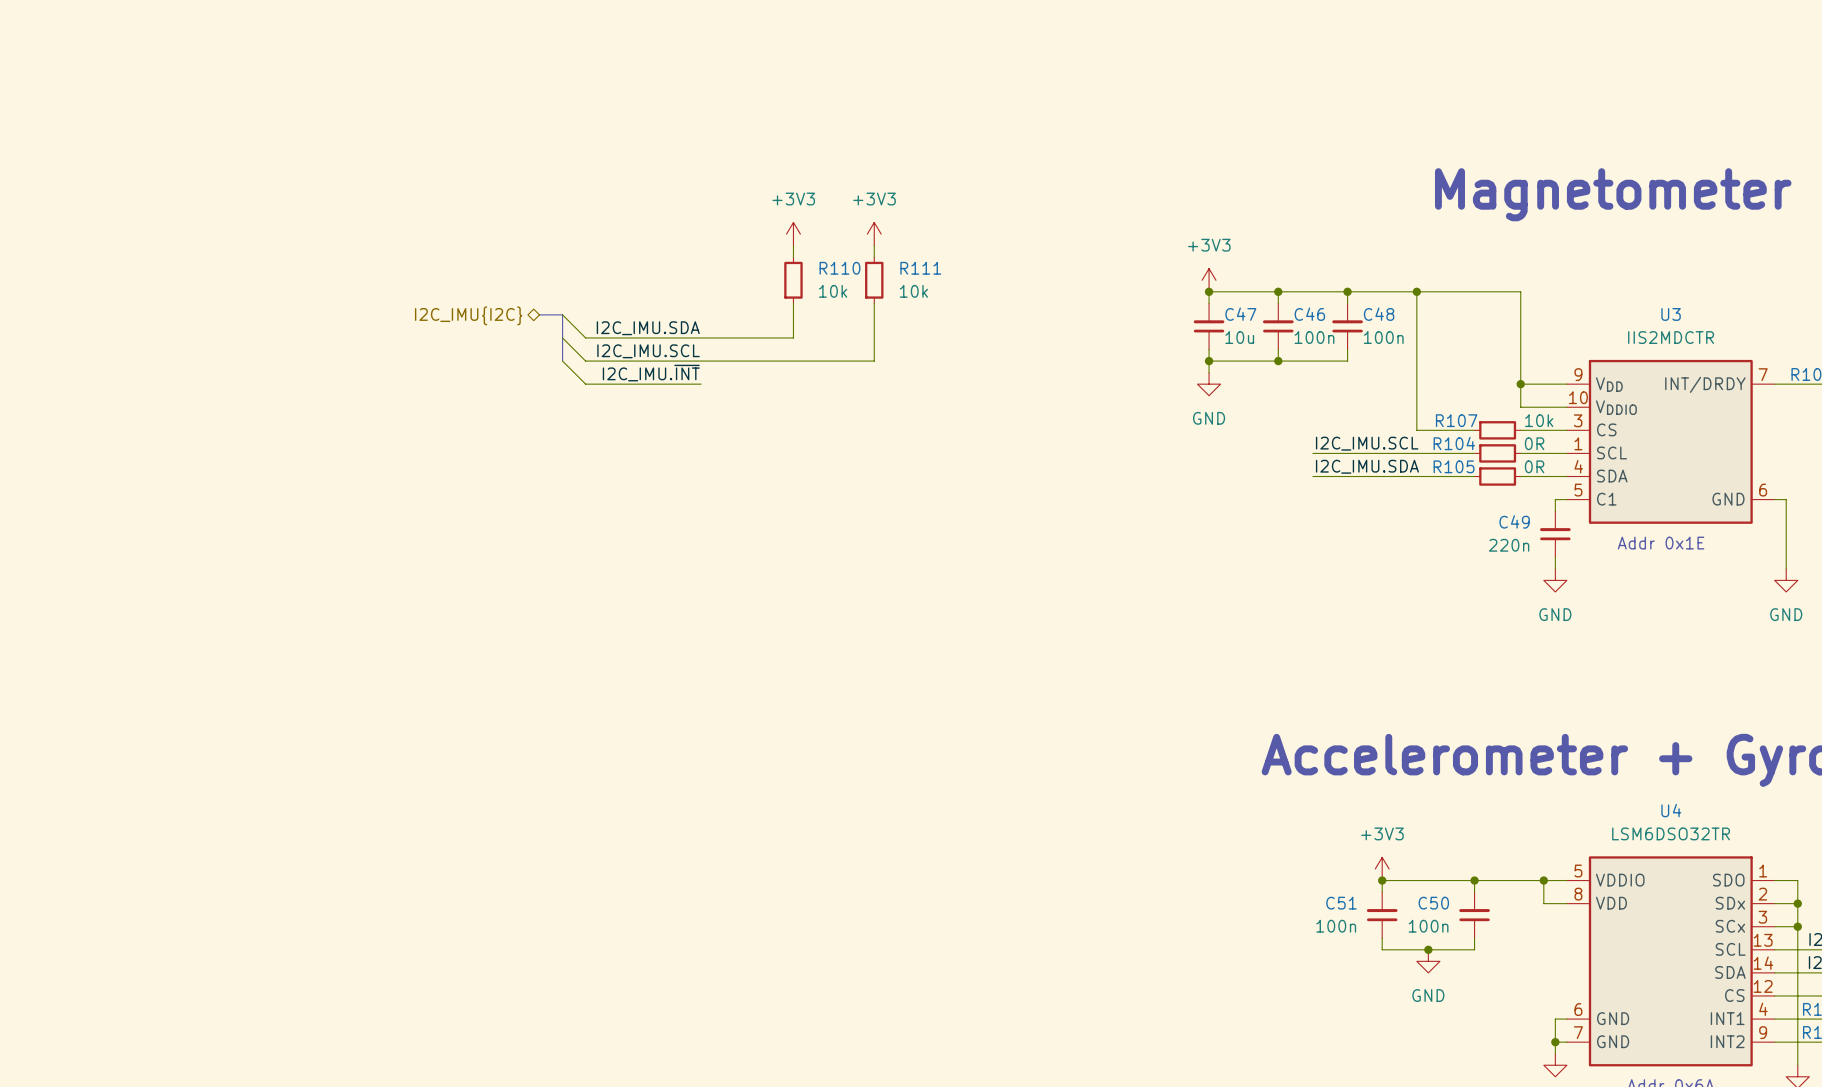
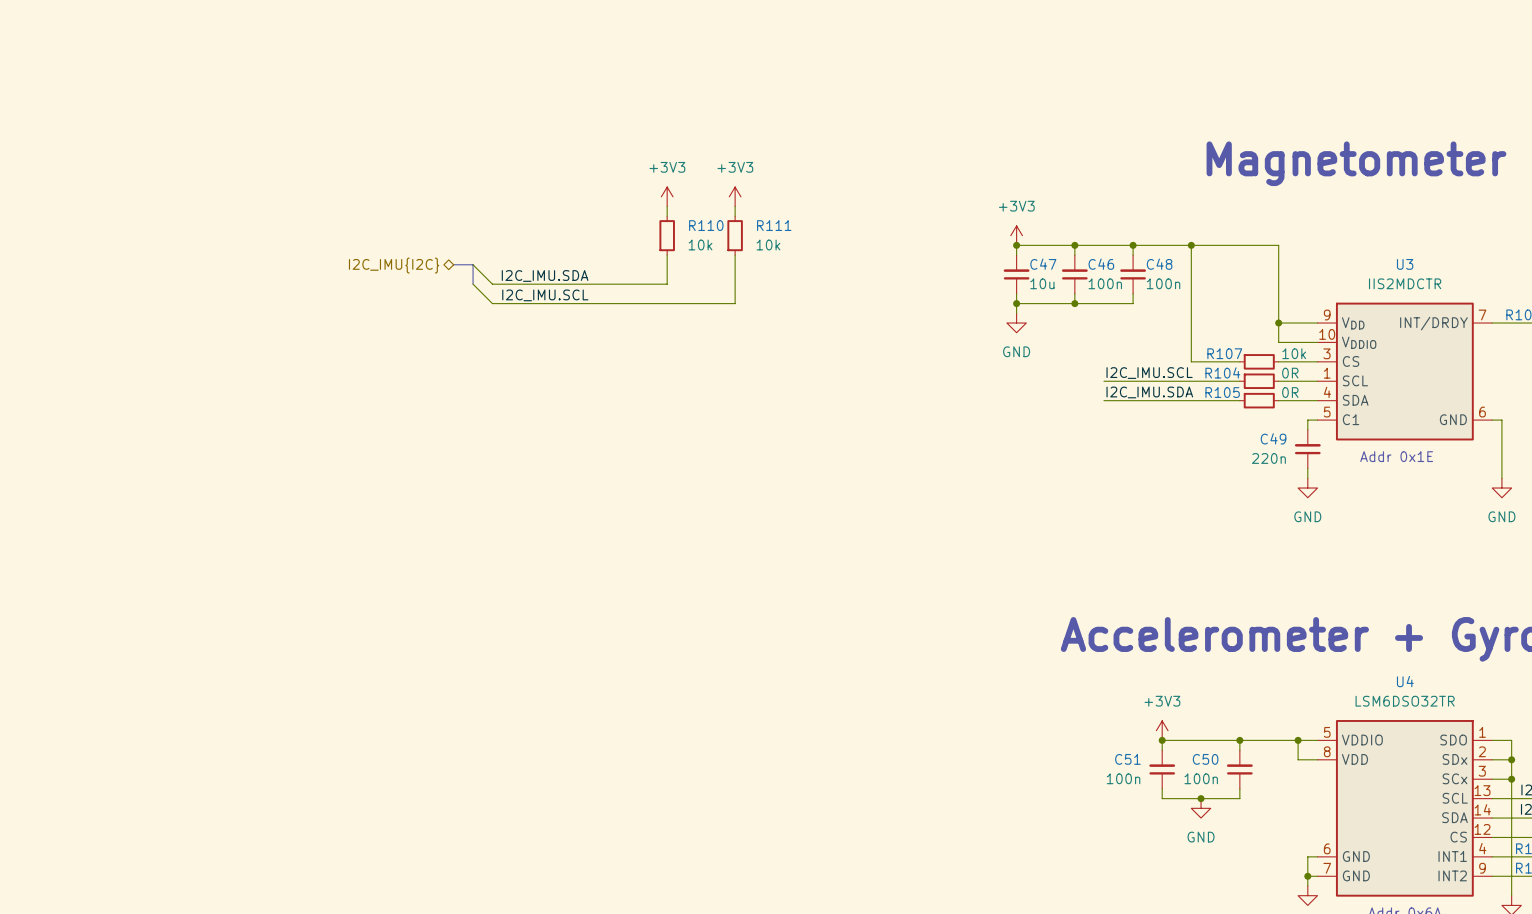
bus: (562, 337) (562, 361) -> none
wire: (562, 361) (585, 384) (701, 384) -> none
label: I2C_IMU.~{INT} (651, 373) -> none

